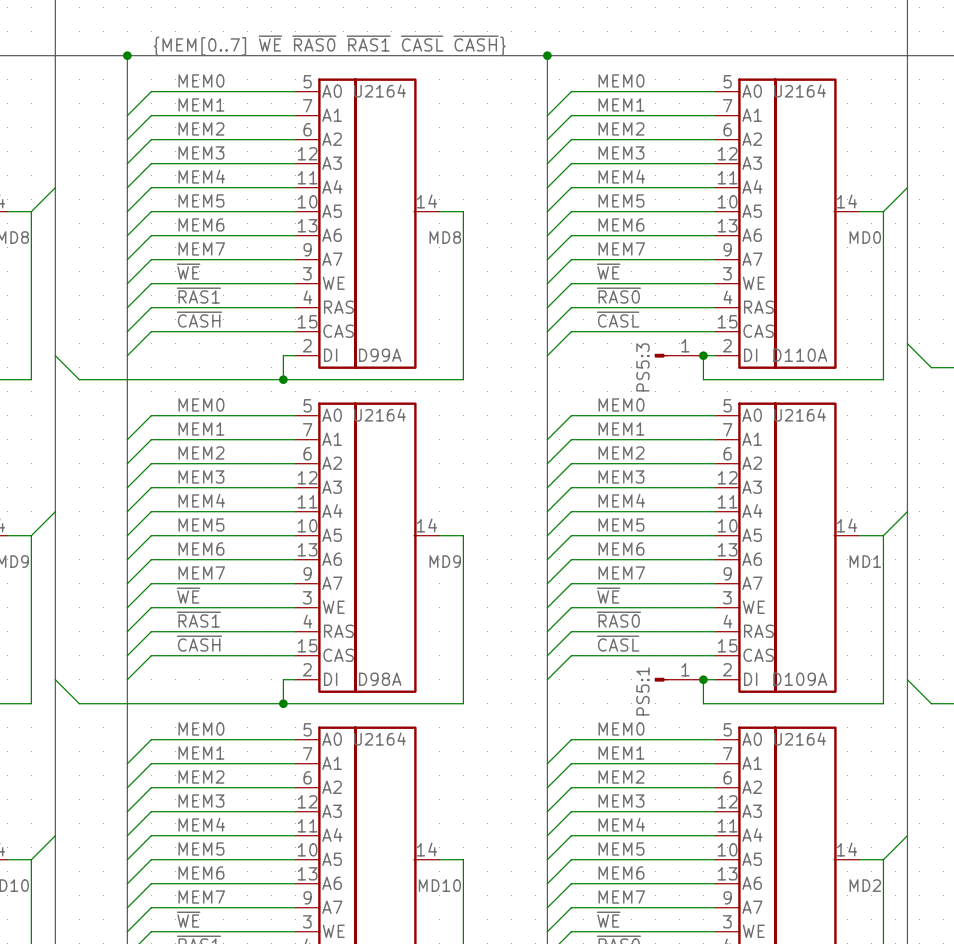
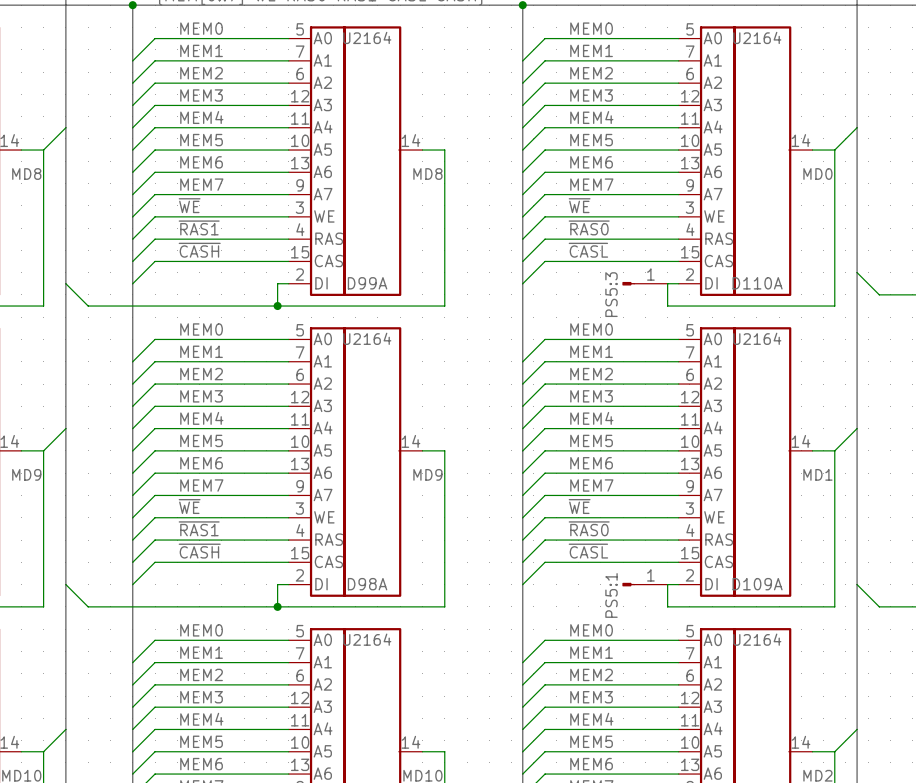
junction: (703, 355) -> none
junction: (703, 679) -> none

